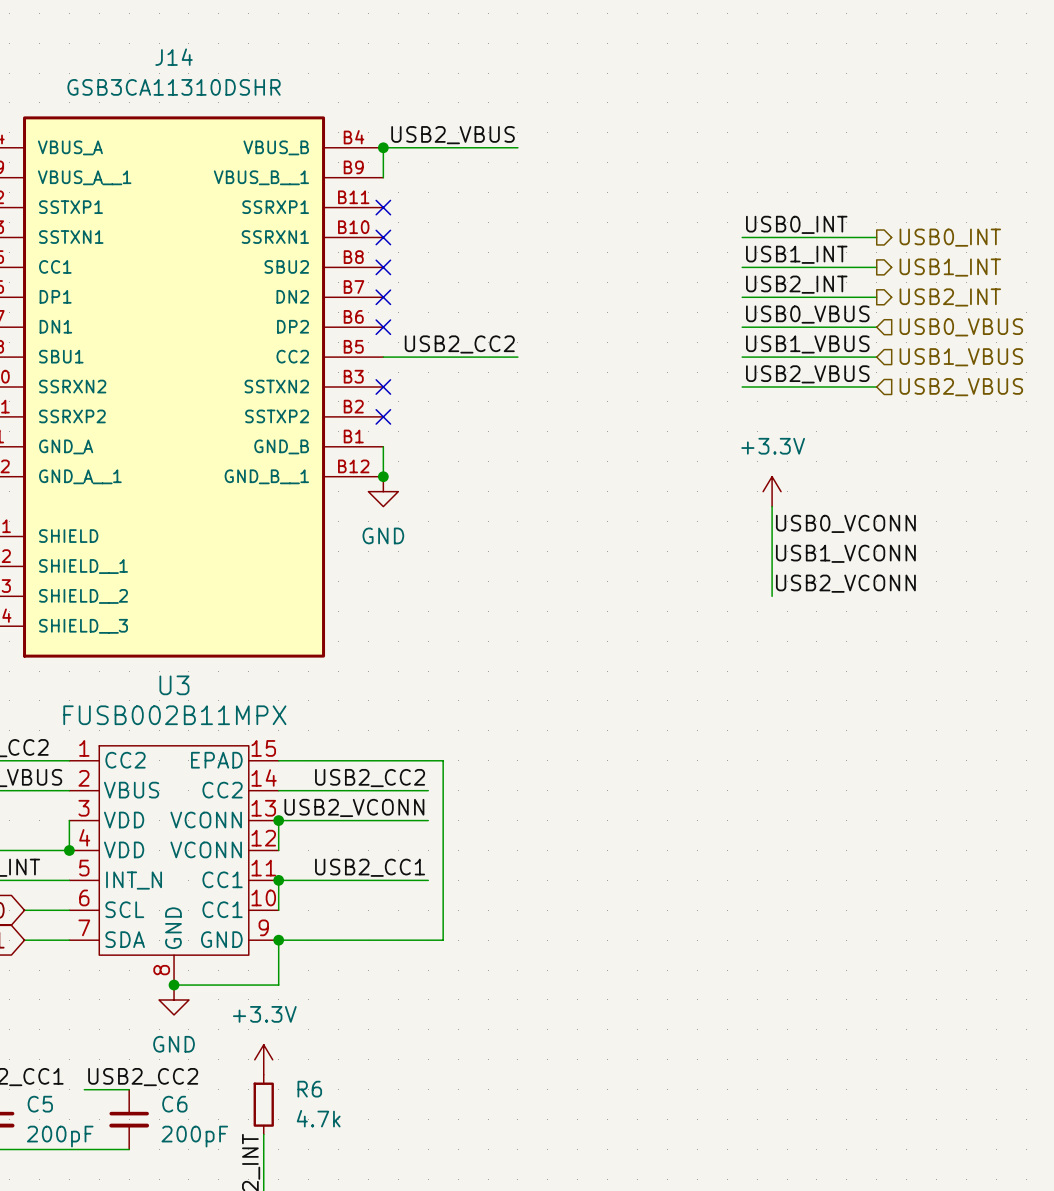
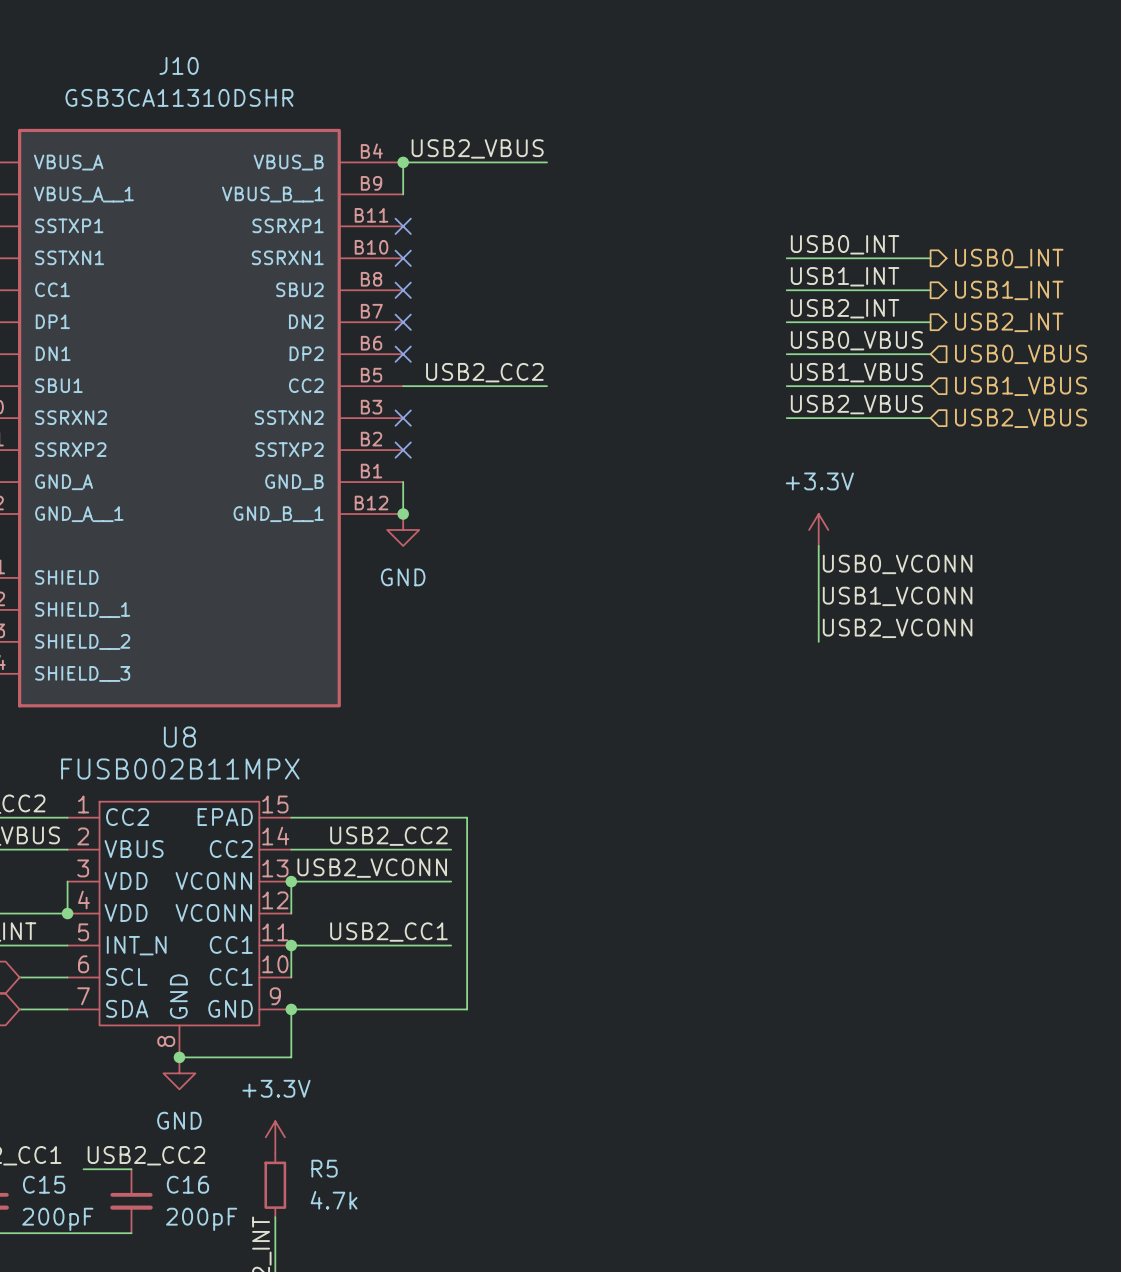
J14 name: J14 (174, 57) -> J10 (179, 65)
U3 name: U3 (174, 685) -> U8 (179, 737)
R6 name: R6 (309, 1089) -> R5 (324, 1168)
C5 name: C5 (40, 1104) -> C15 (44, 1184)
C6 name: C6 (174, 1104) -> C16 (187, 1184)

